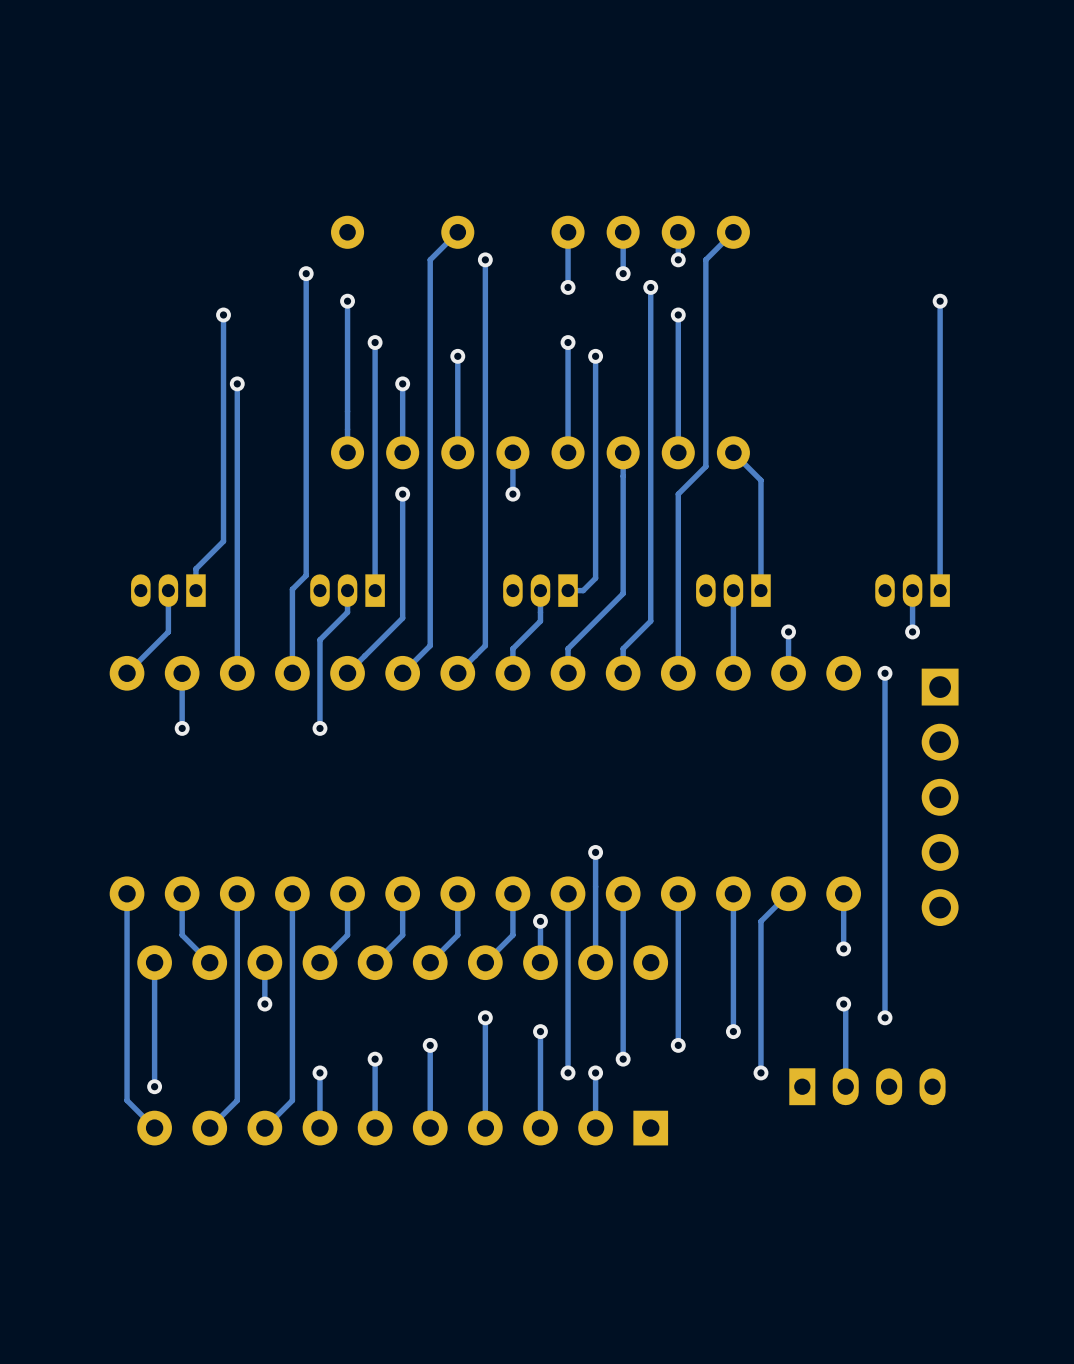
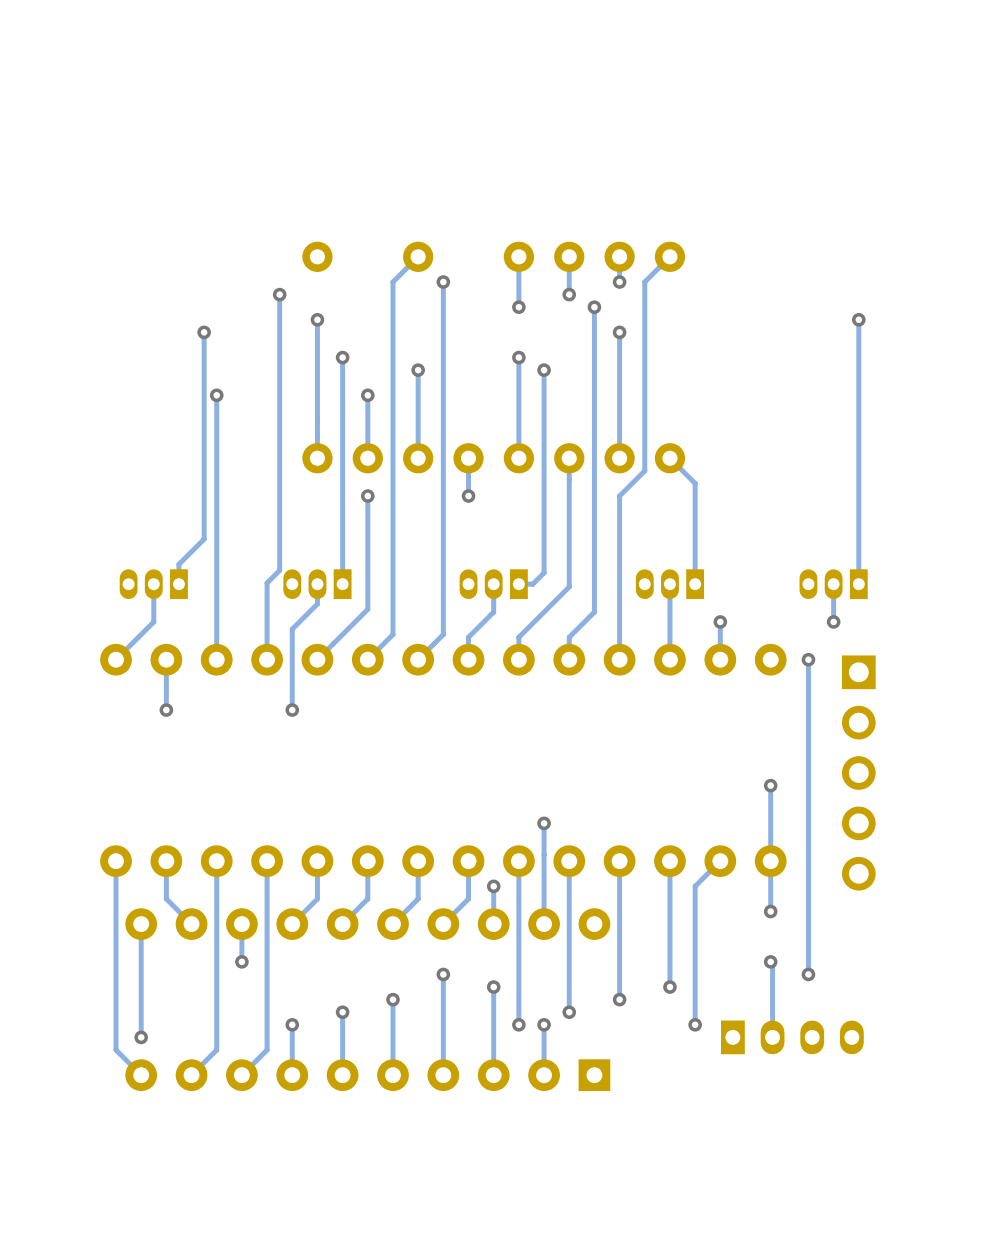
track: none -> (770, 785) (770, 861)
via: none -> (770, 785)

